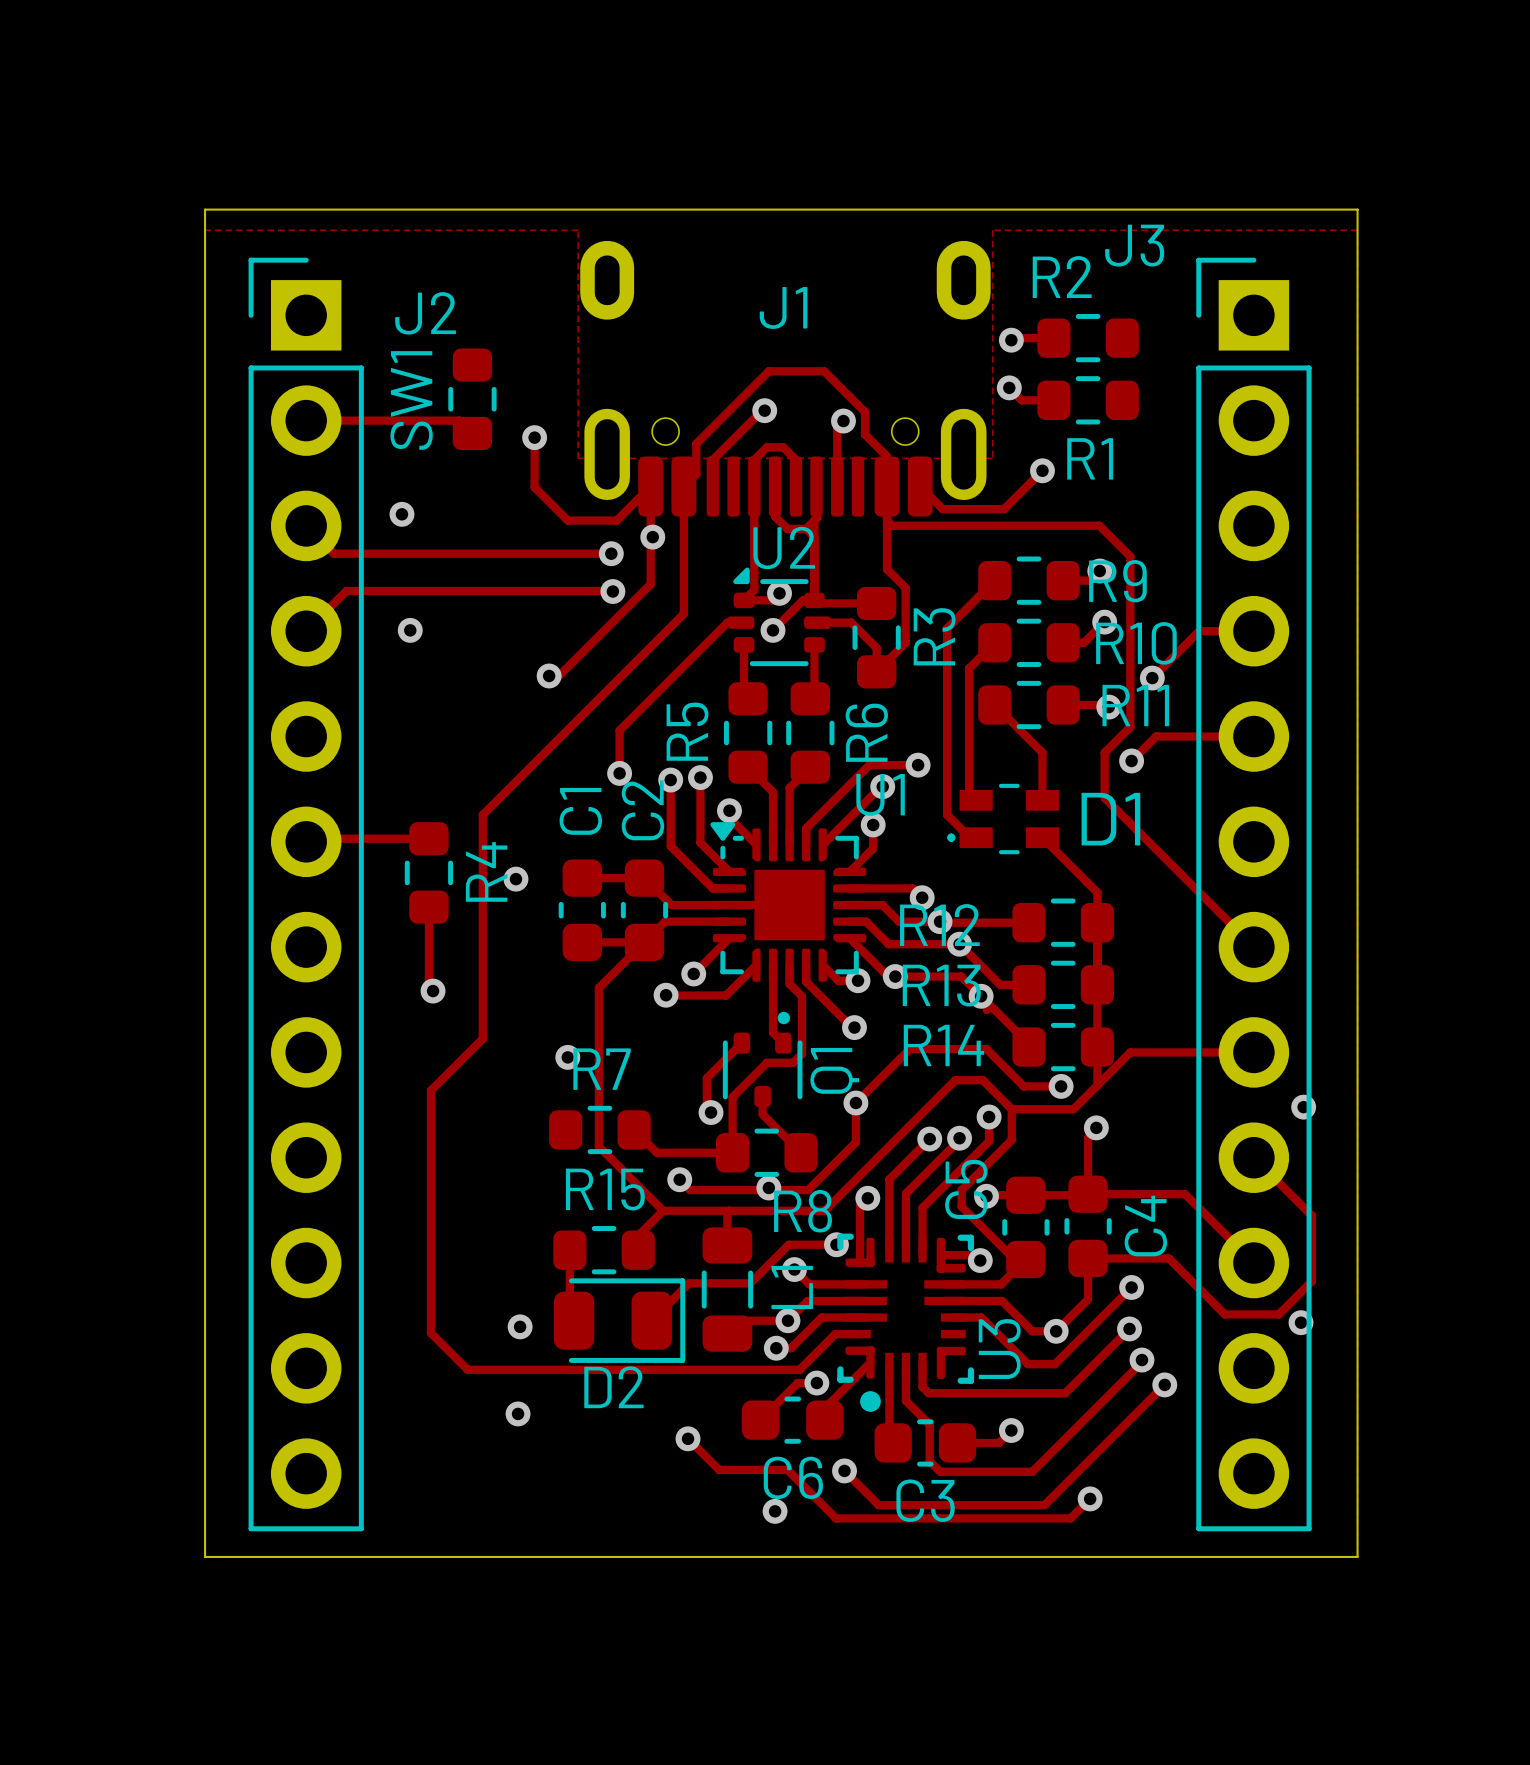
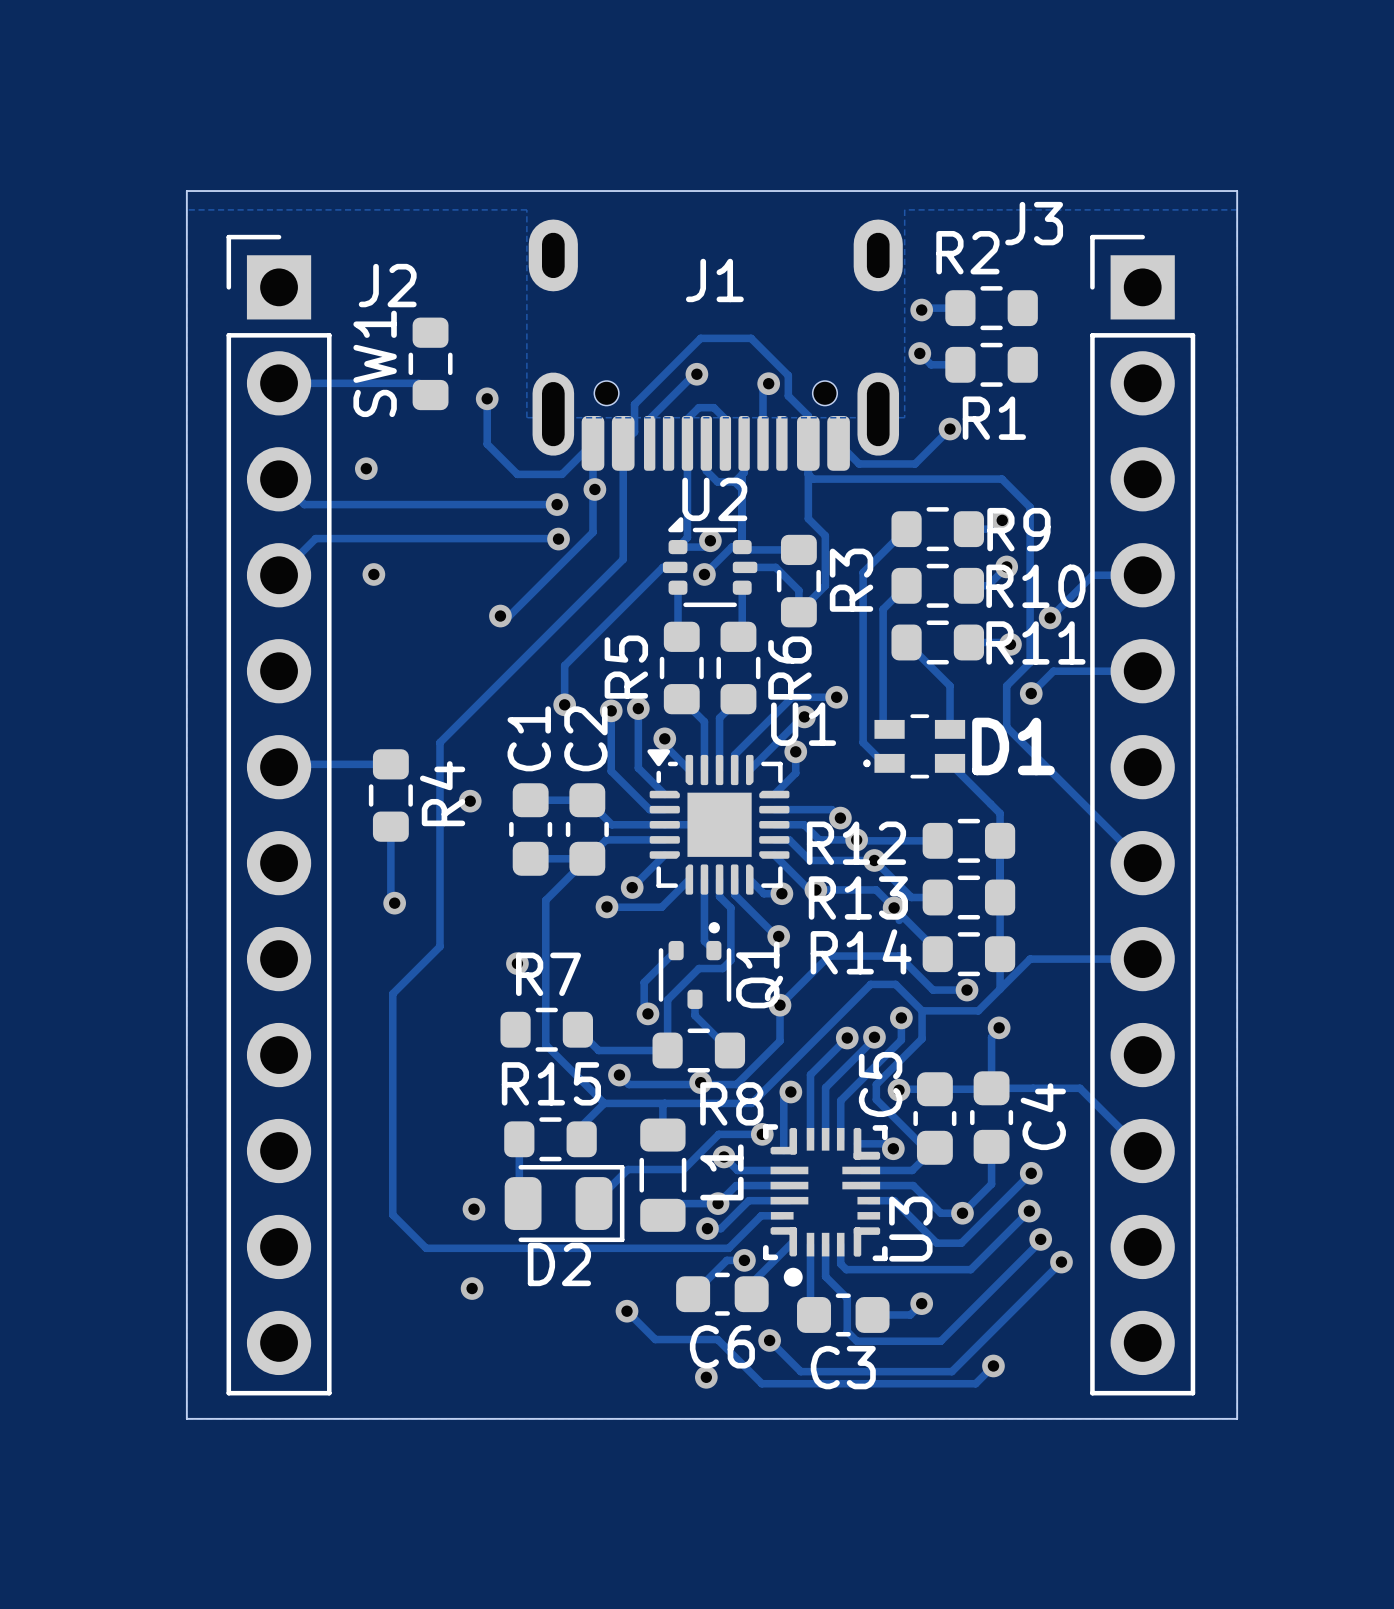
via: (1303, 1107) -> none
track: (1253, 1157) (1311, 1215) (1311, 1281) (1278, 1314) (1224, 1314) (1168, 1258) (1088, 1258) -> none
via: (1301, 1322) -> none

